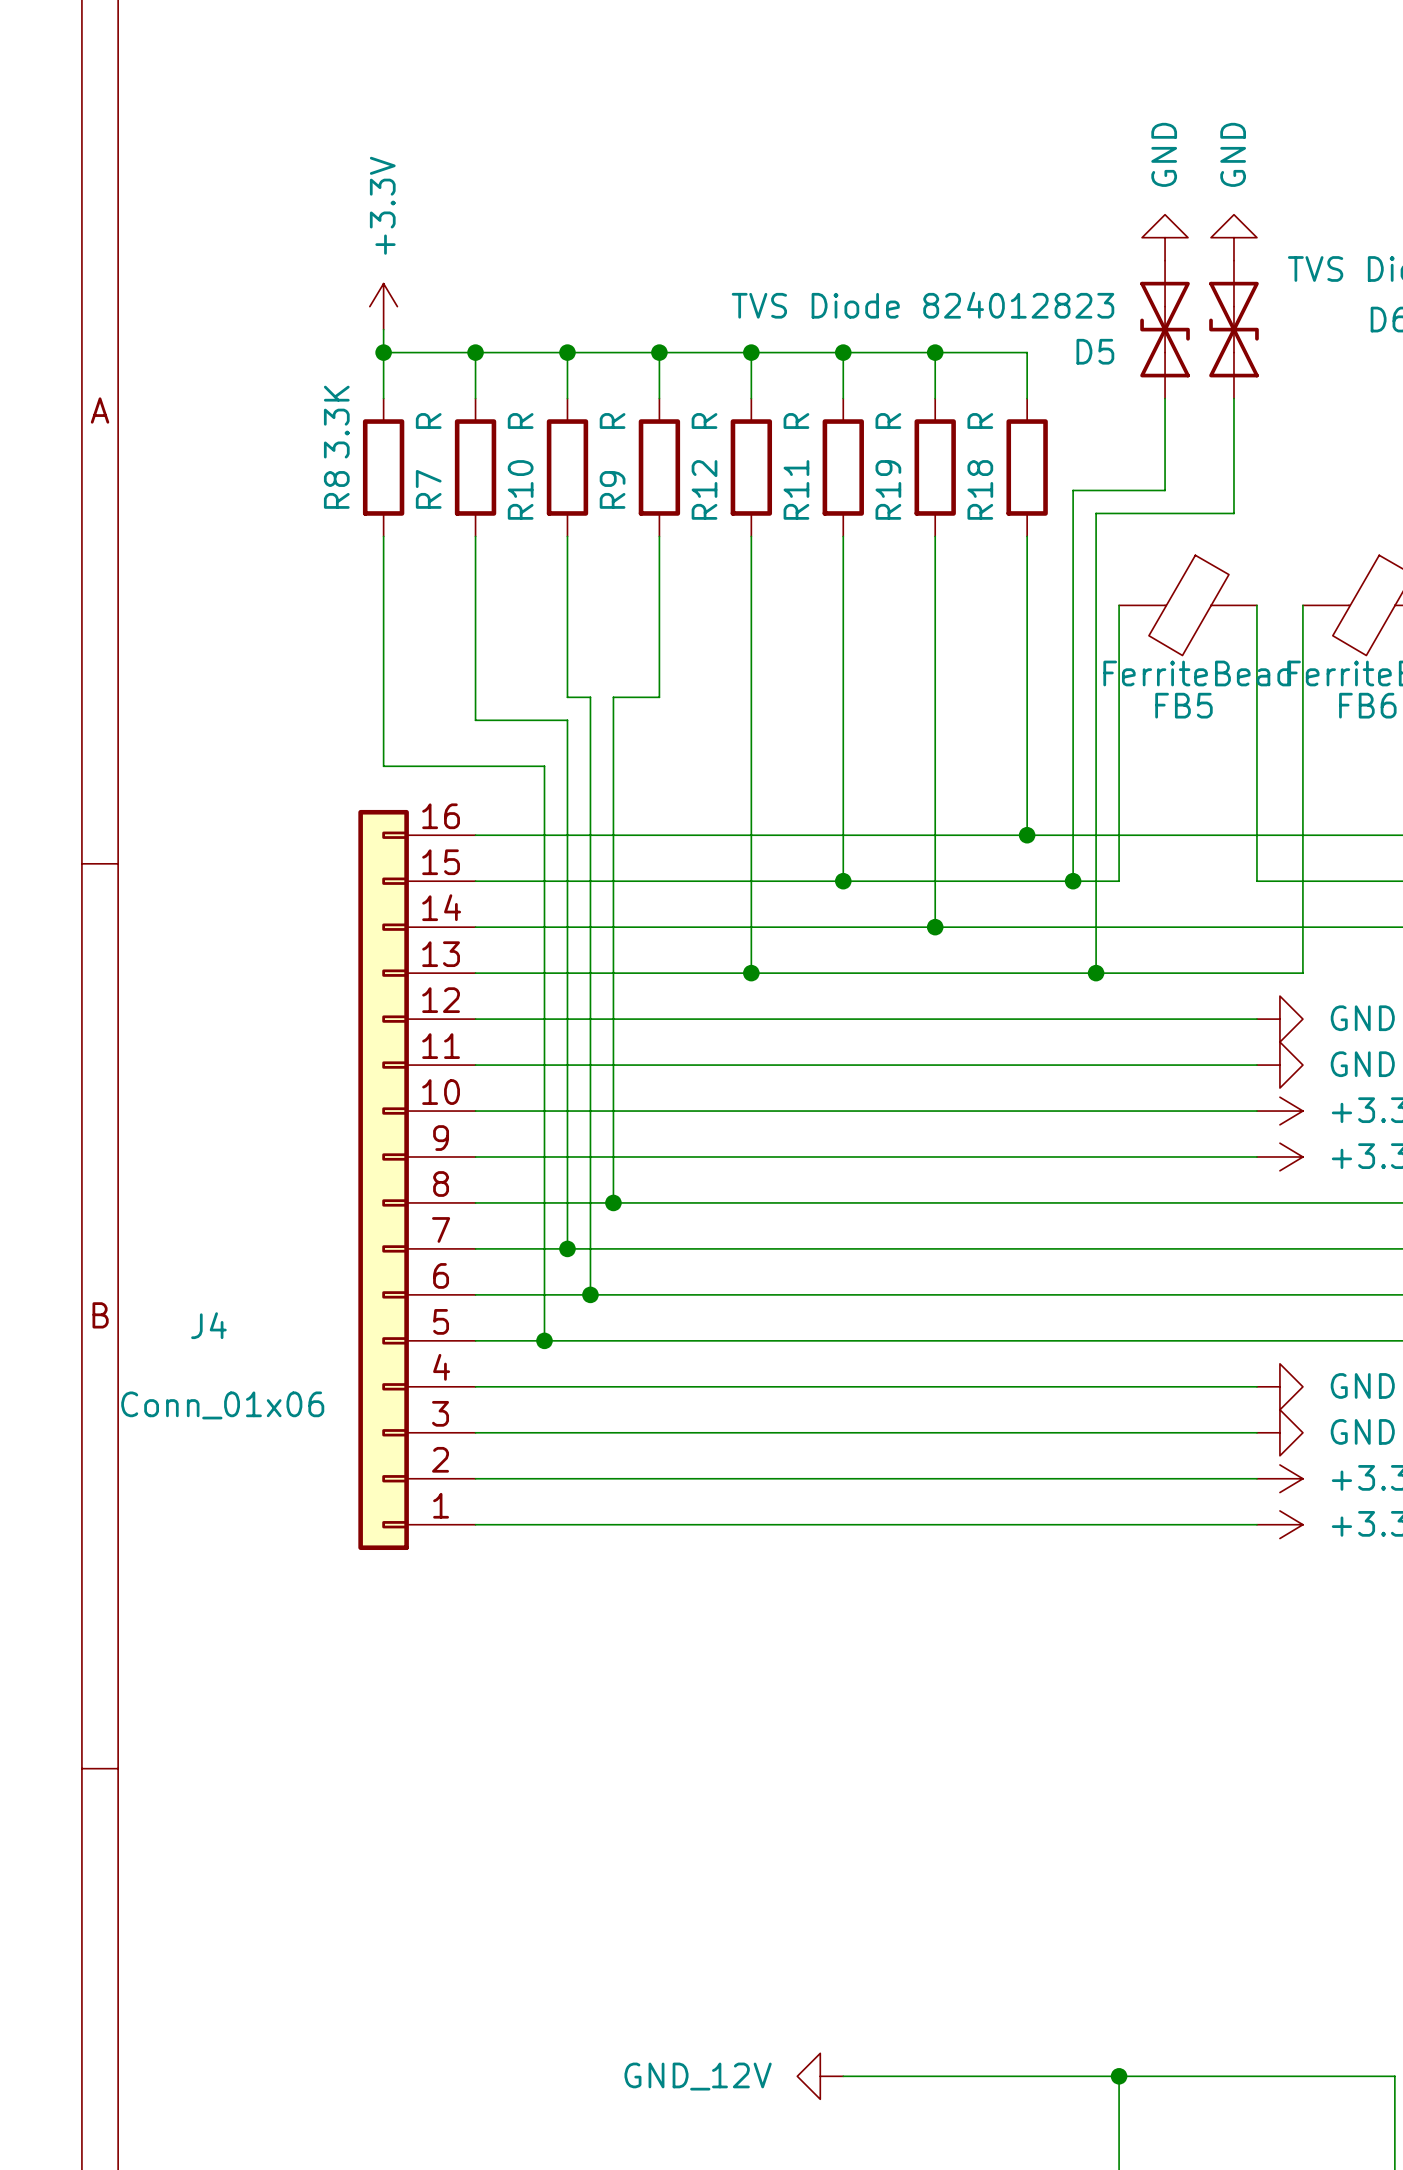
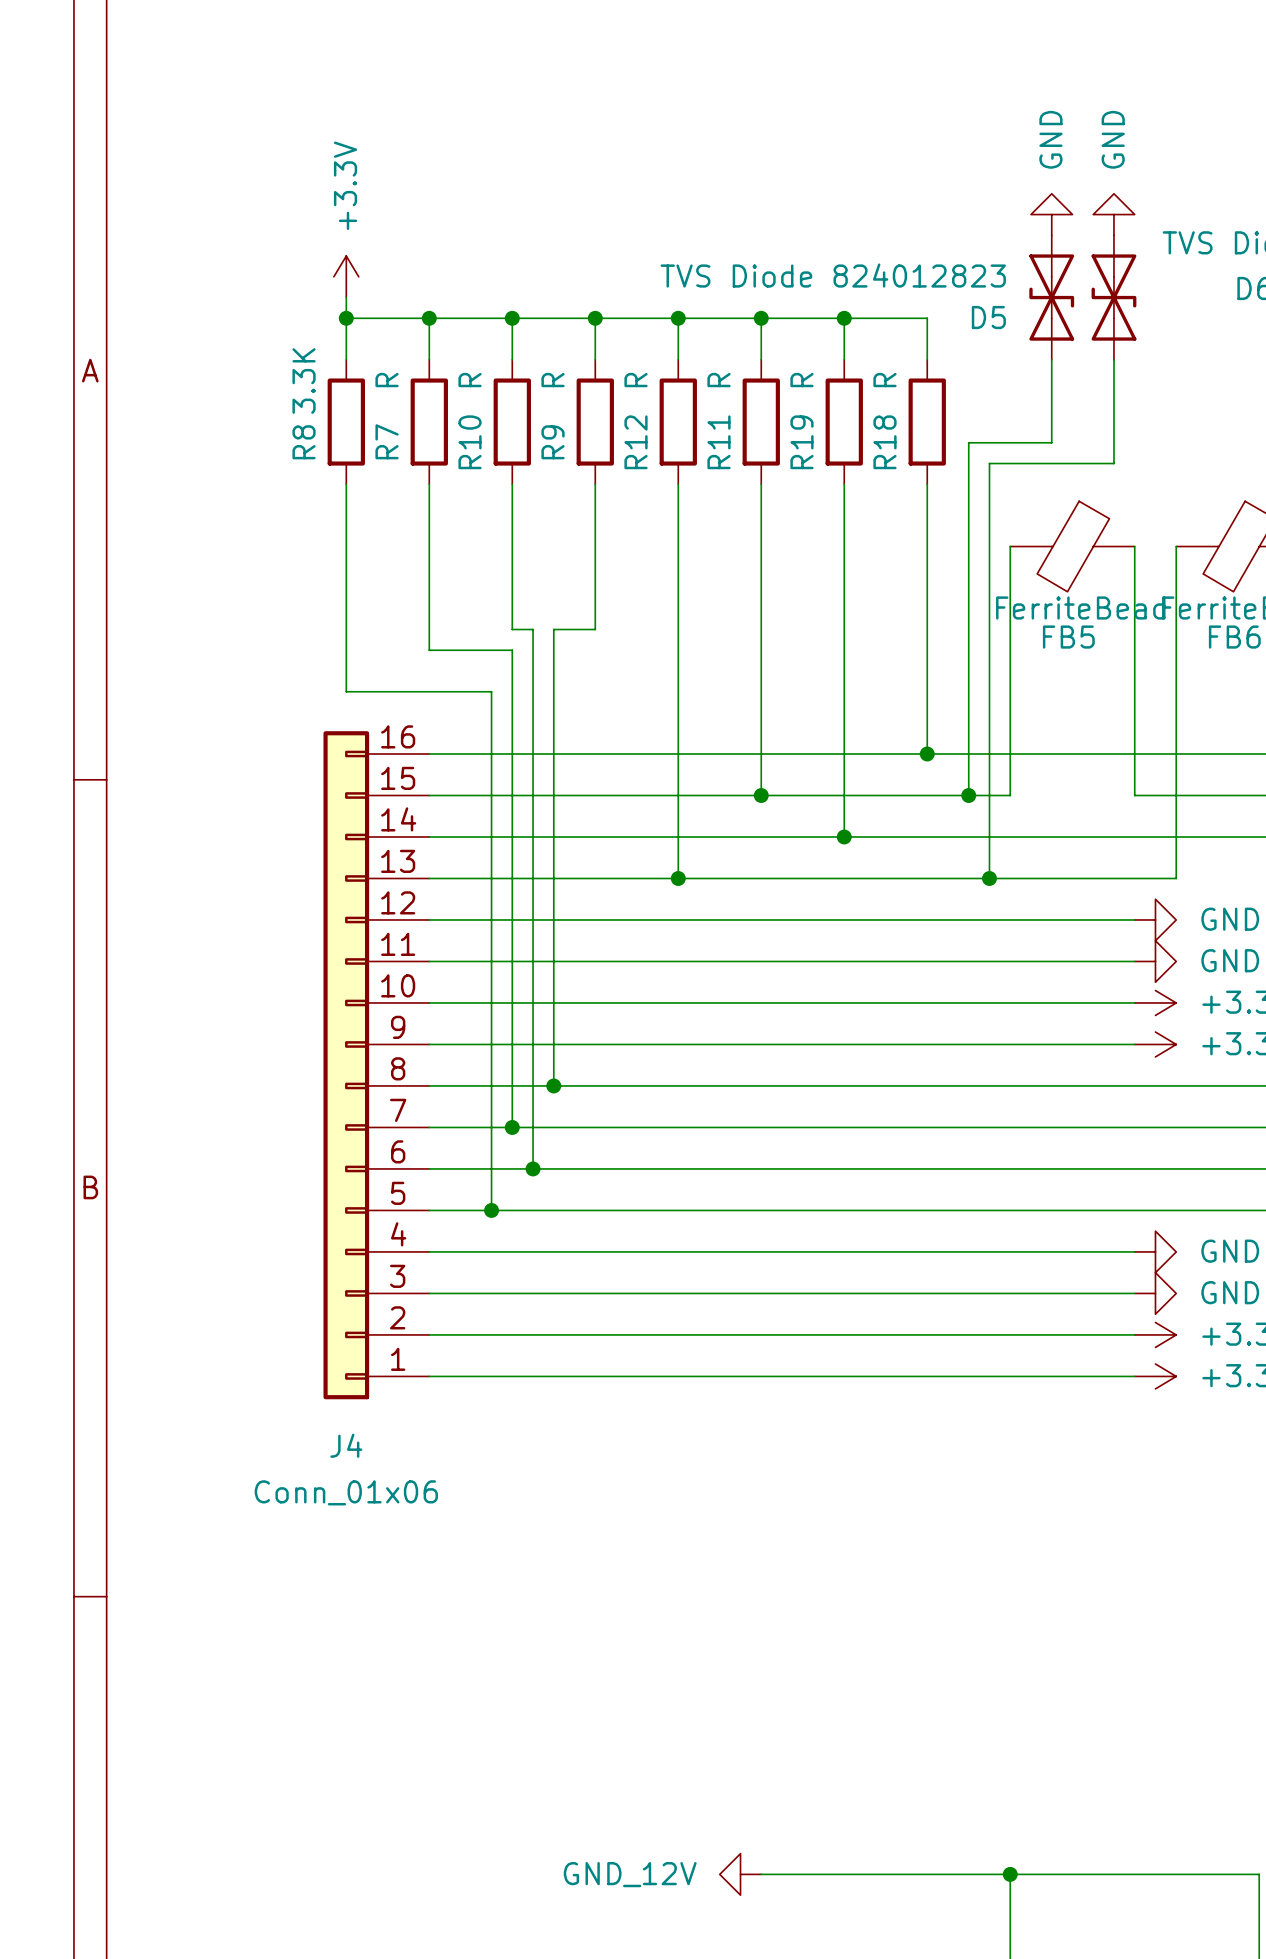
J4 name position: J4 (208, 1325) -> J4 (346, 1445)
J4 value position: Conn_01x06 (222, 1405) -> Conn_01x06 (346, 1492)

